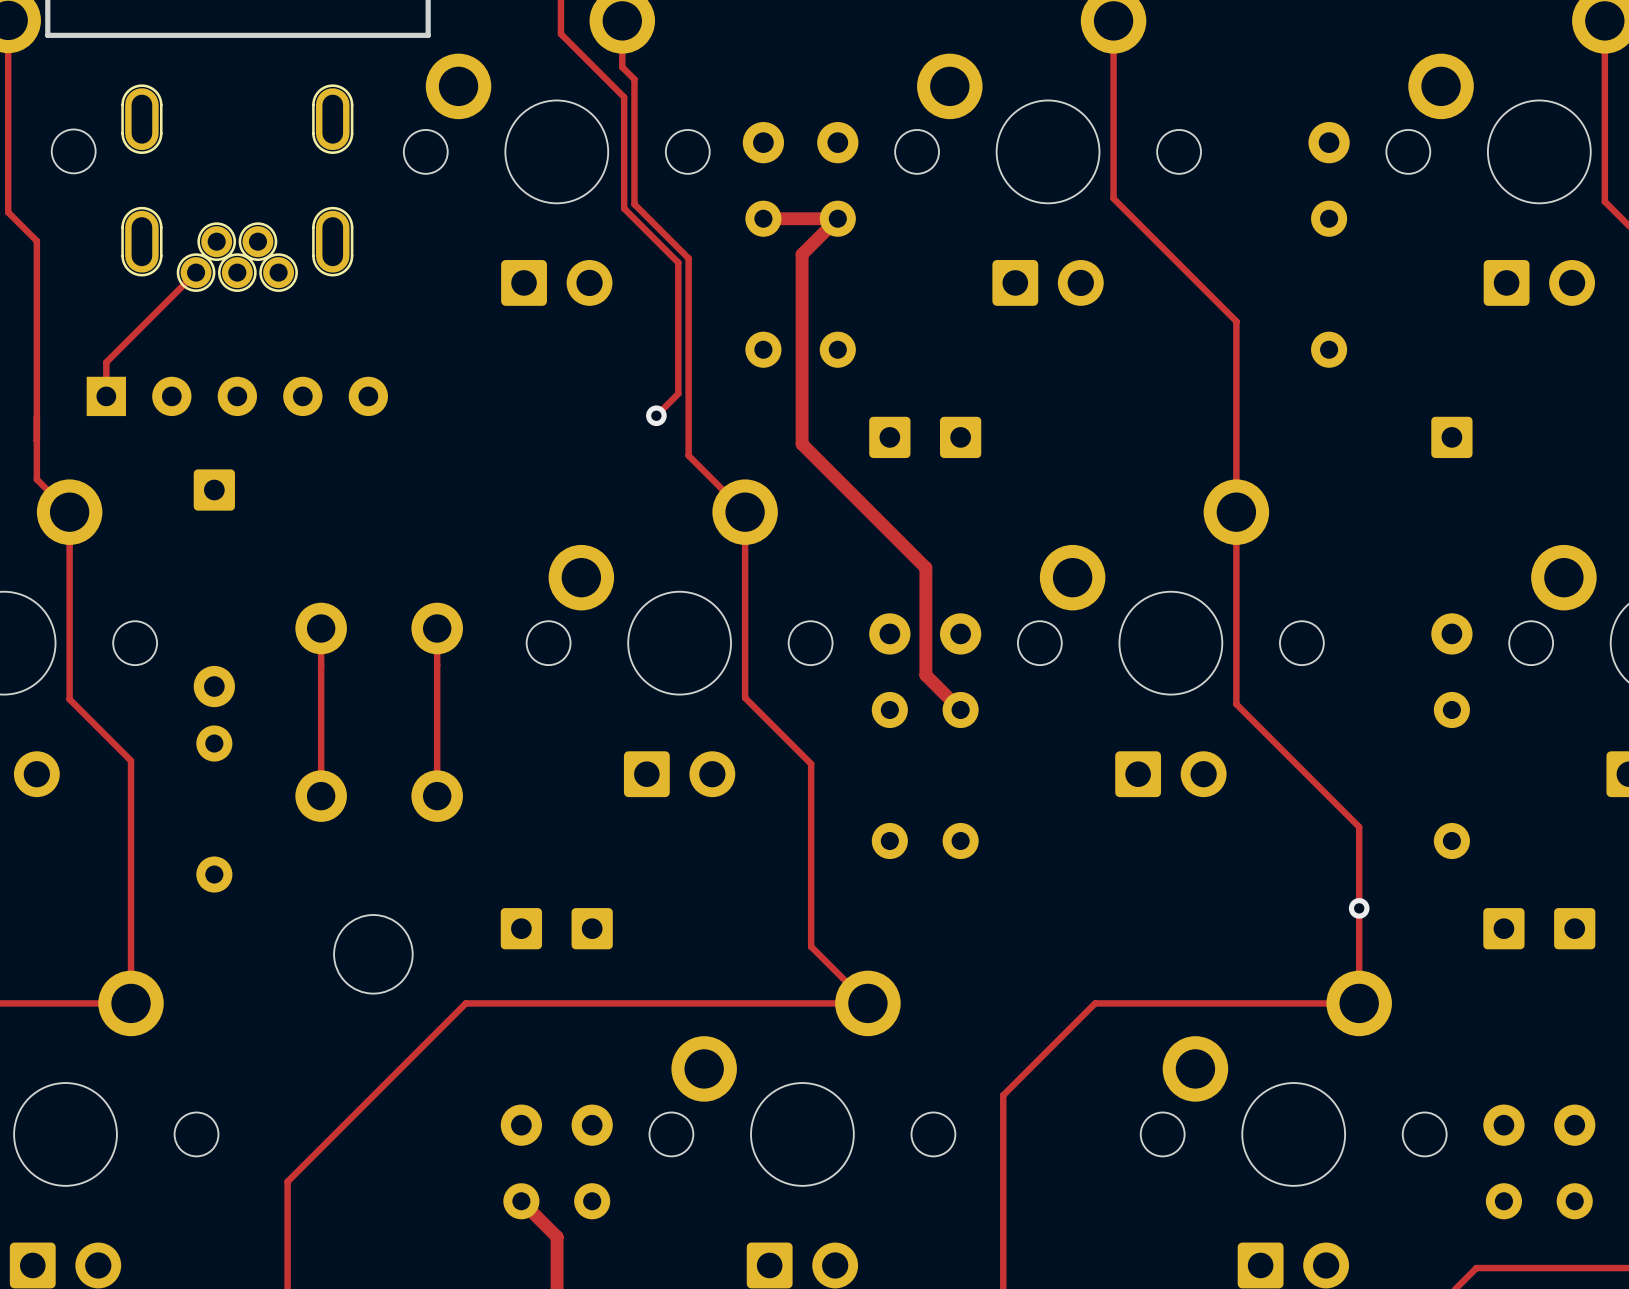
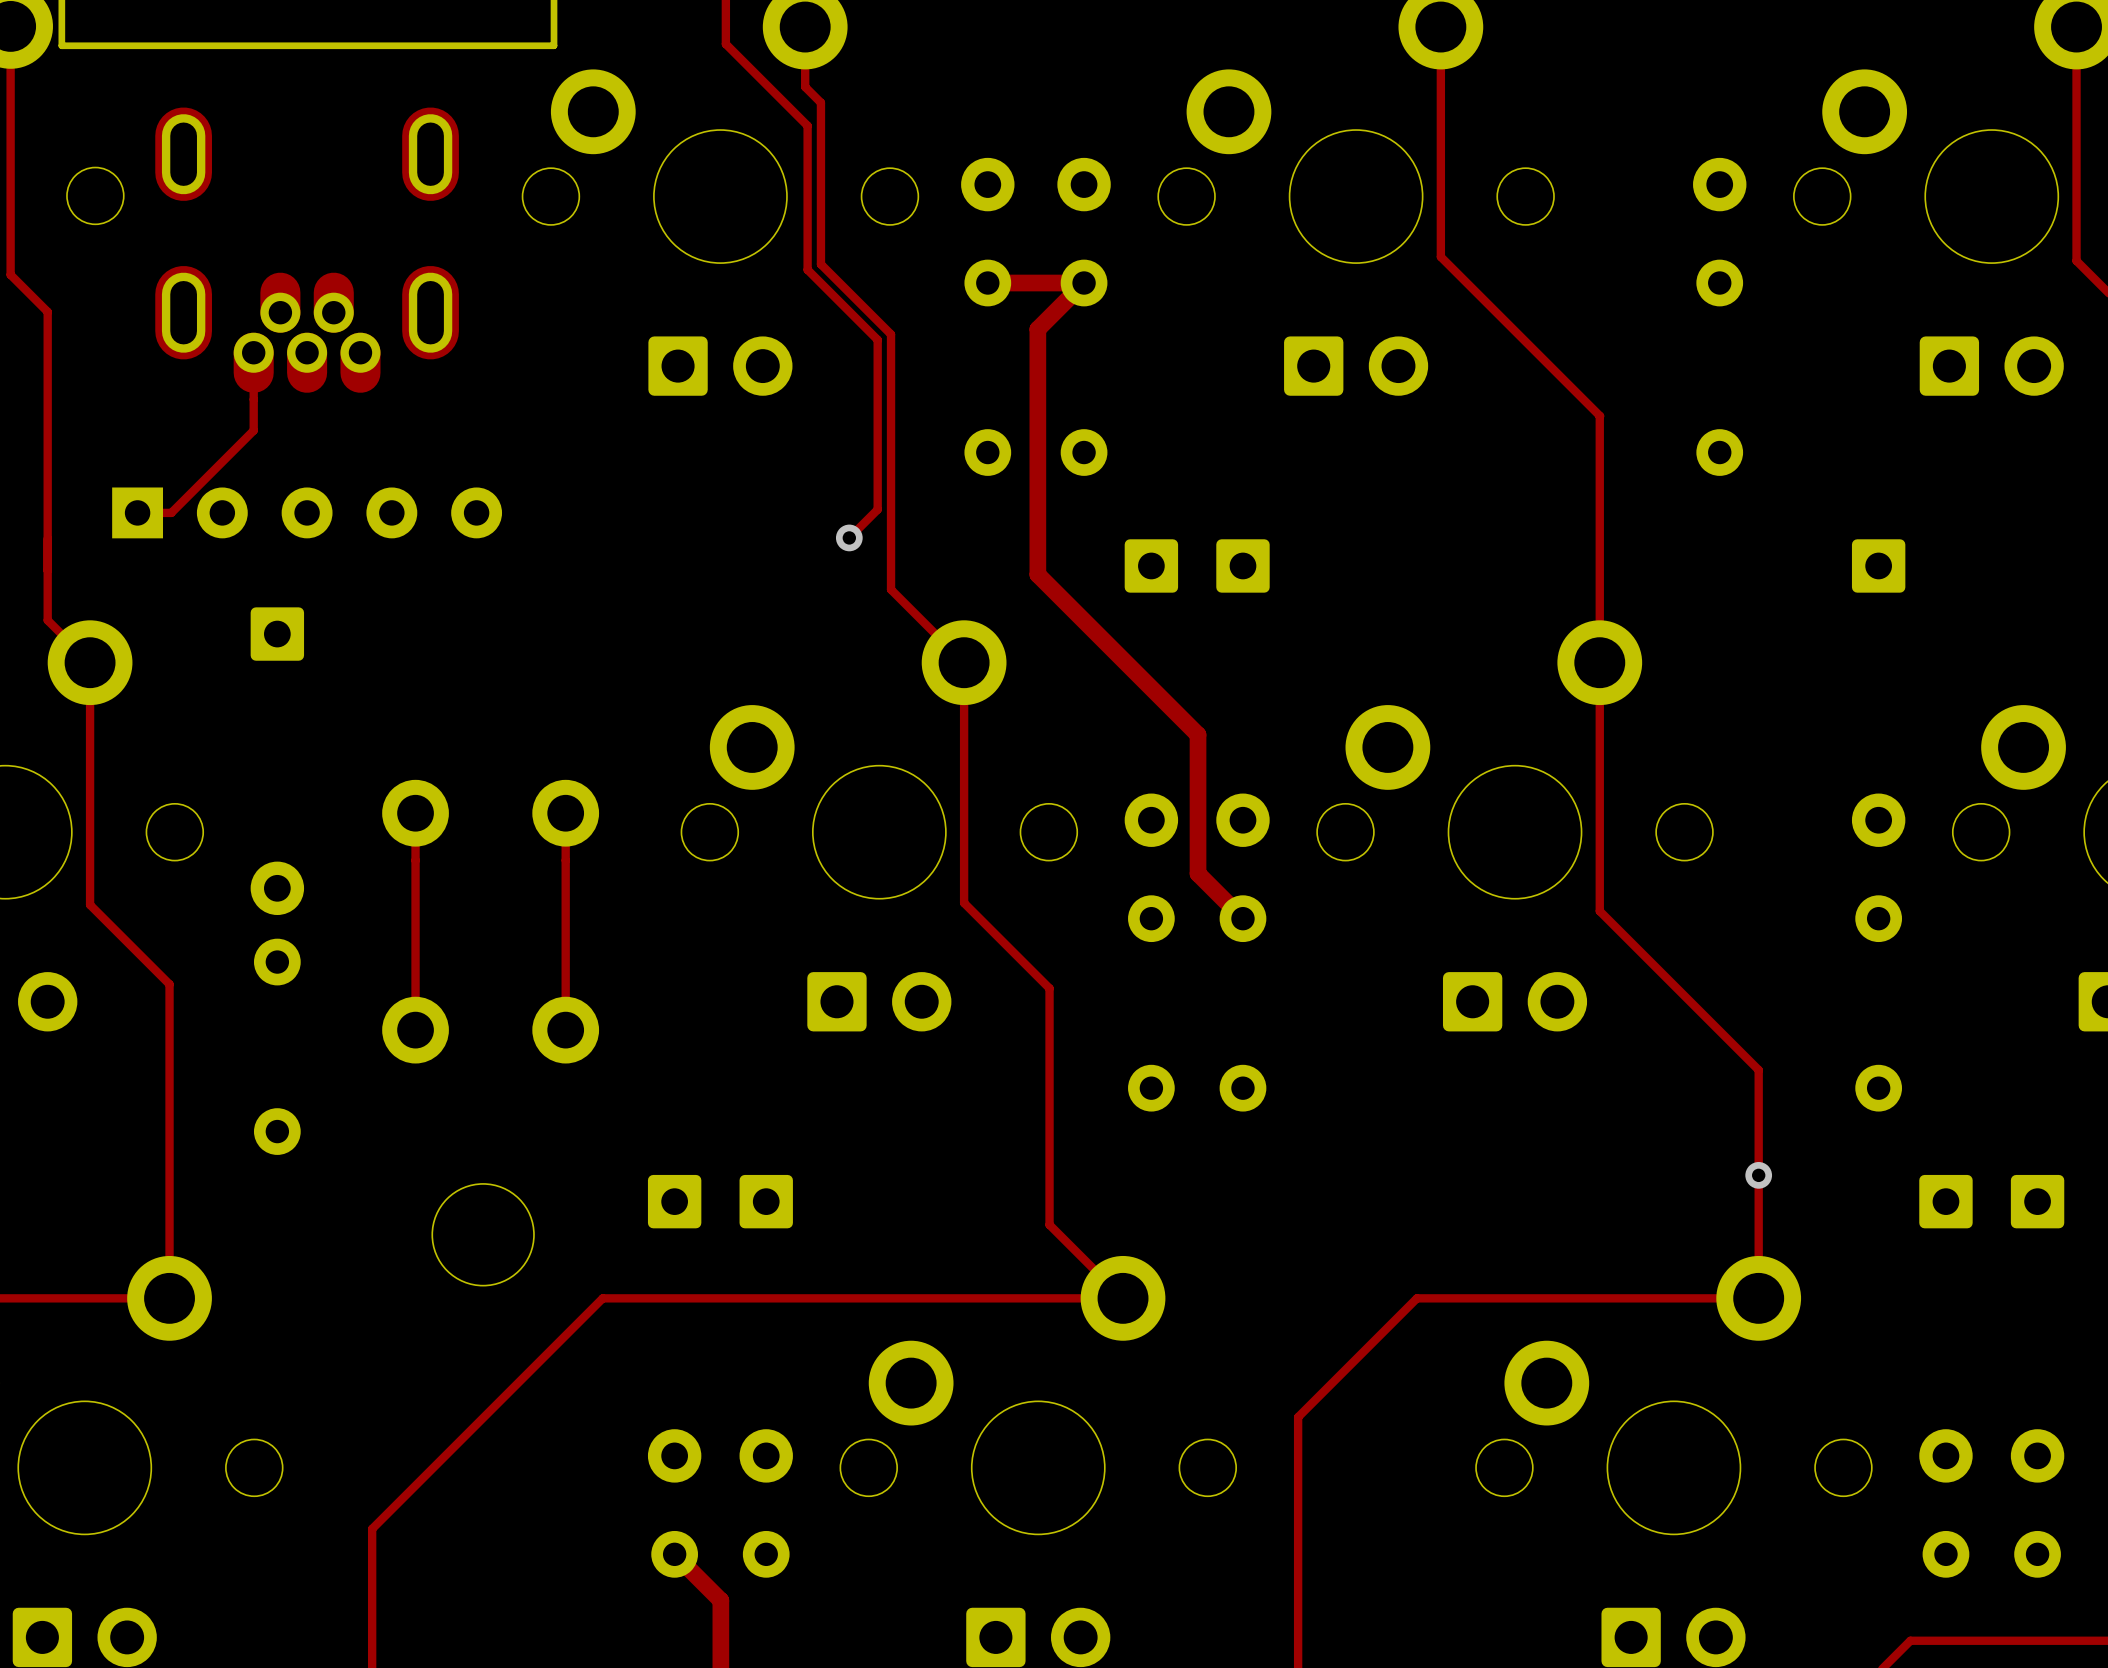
part footprint: [121, 84, 354, 292] -> [155, 107, 459, 393]
track: (196, 272) (106, 362) (106, 396) -> (253, 352) (253, 430) (171, 512) (137, 512)

